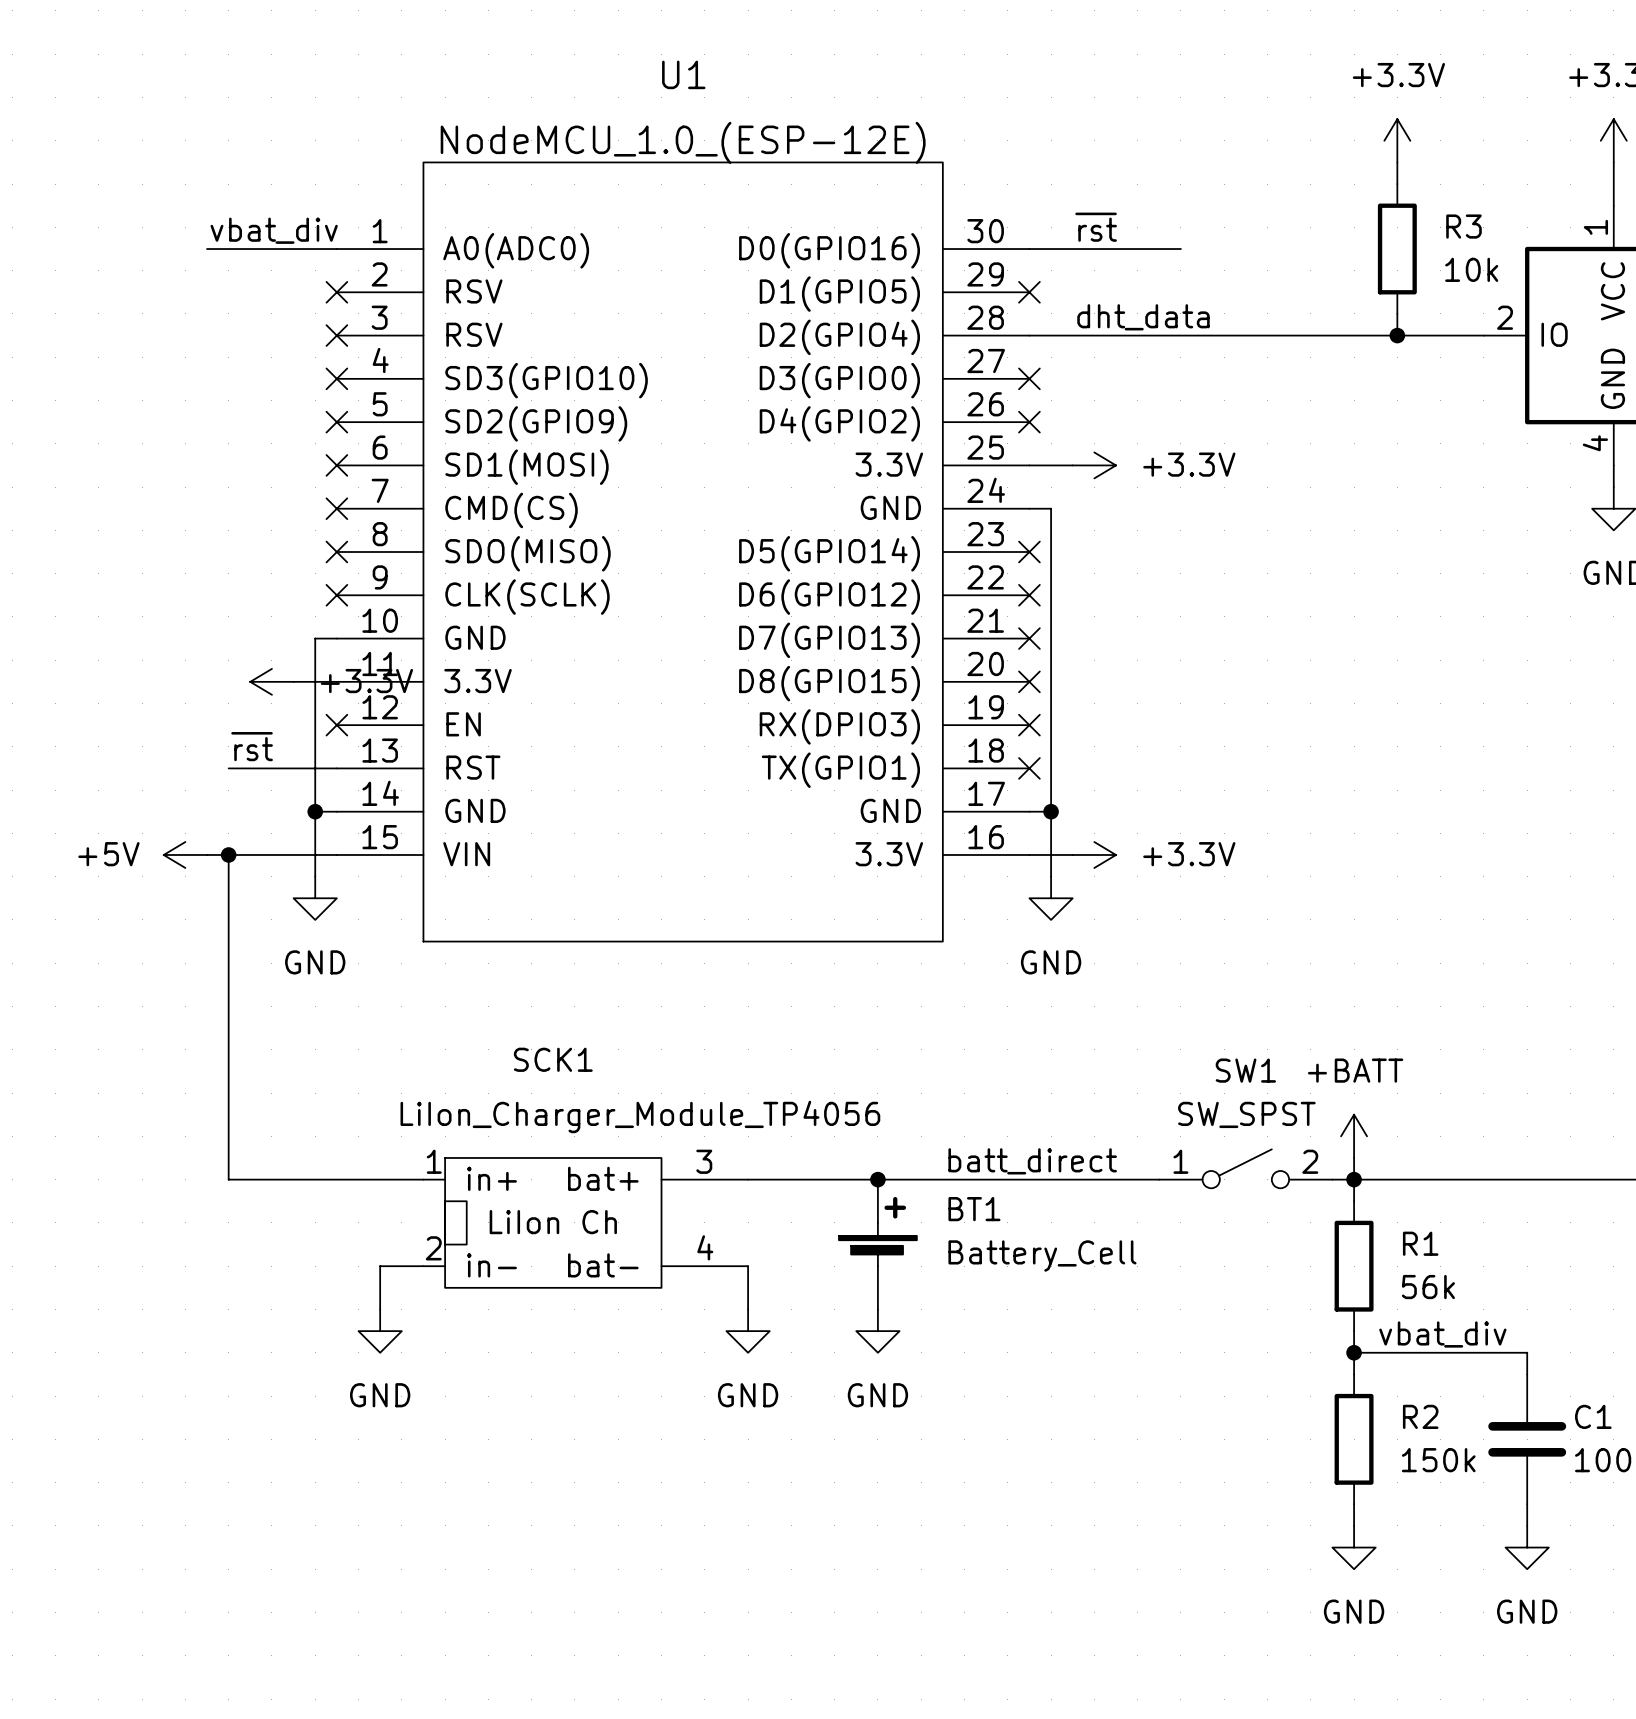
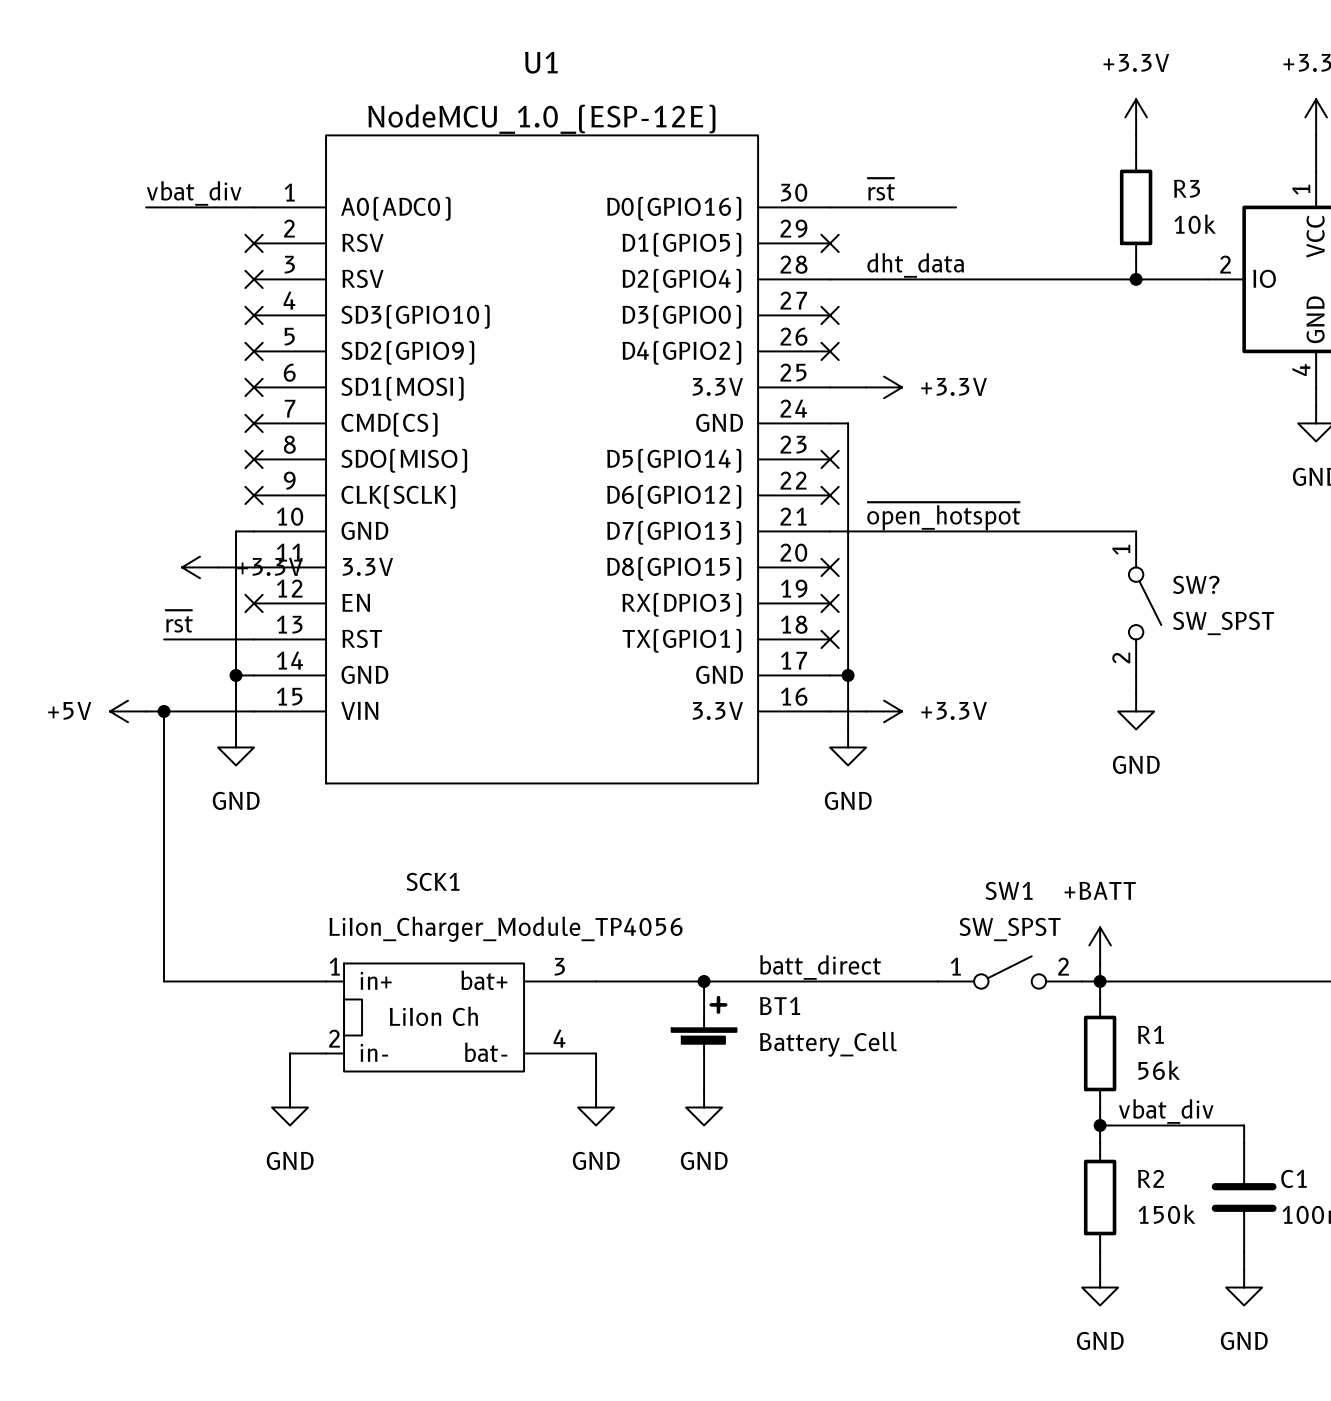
label: none -> ~{open_hotspot} (943, 516)
wire: none -> (830, 531) (1136, 531)
no-connect mark: (1029, 638) -> none
SW?: none -> SW_SPST (1145, 603)
wire: none -> (1136, 675) (1136, 693)
power symbol: none -> GND (1136, 711)

